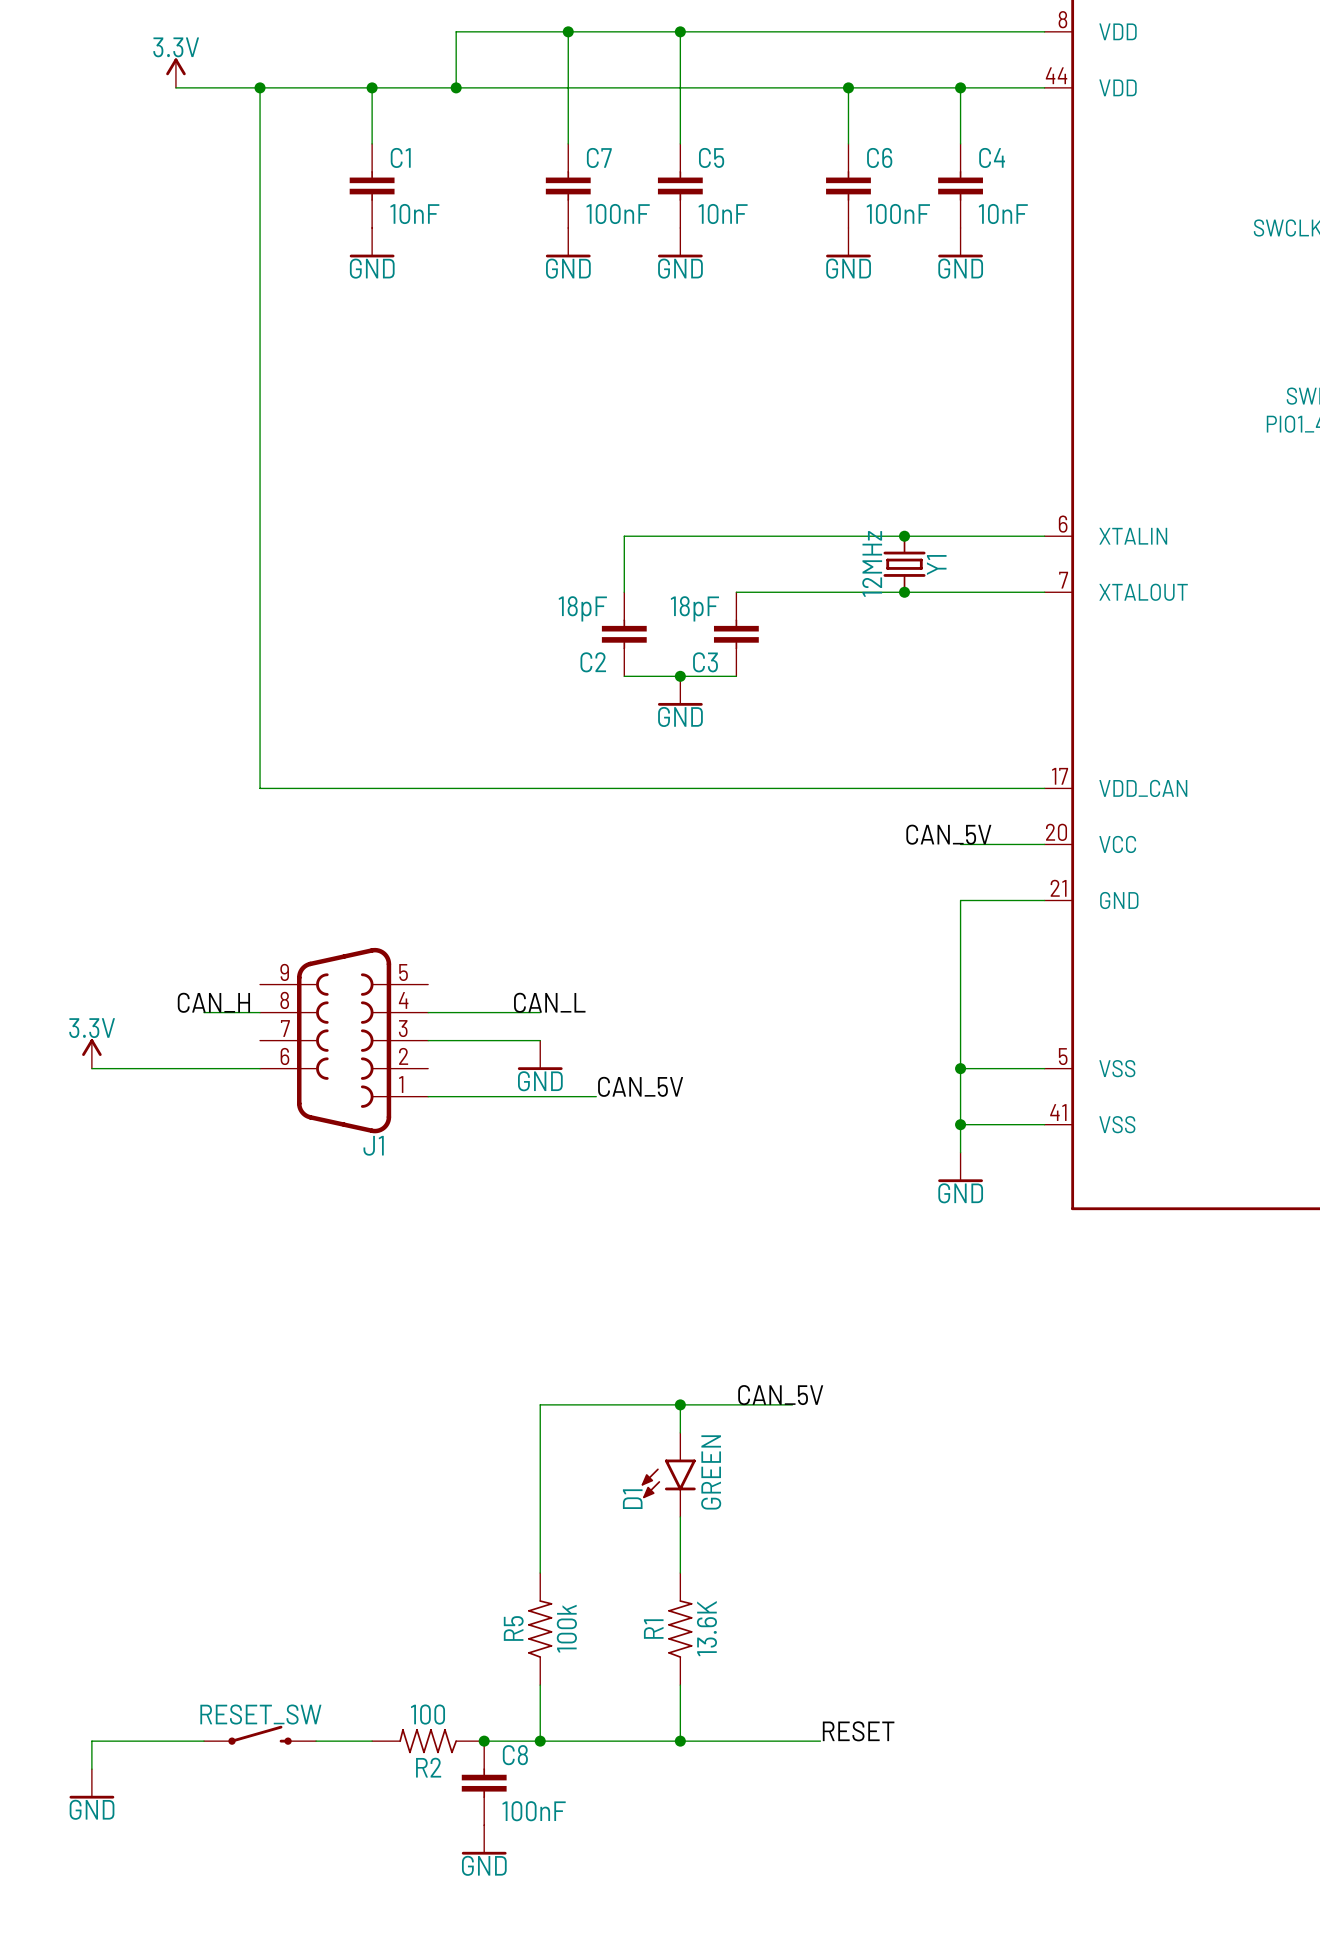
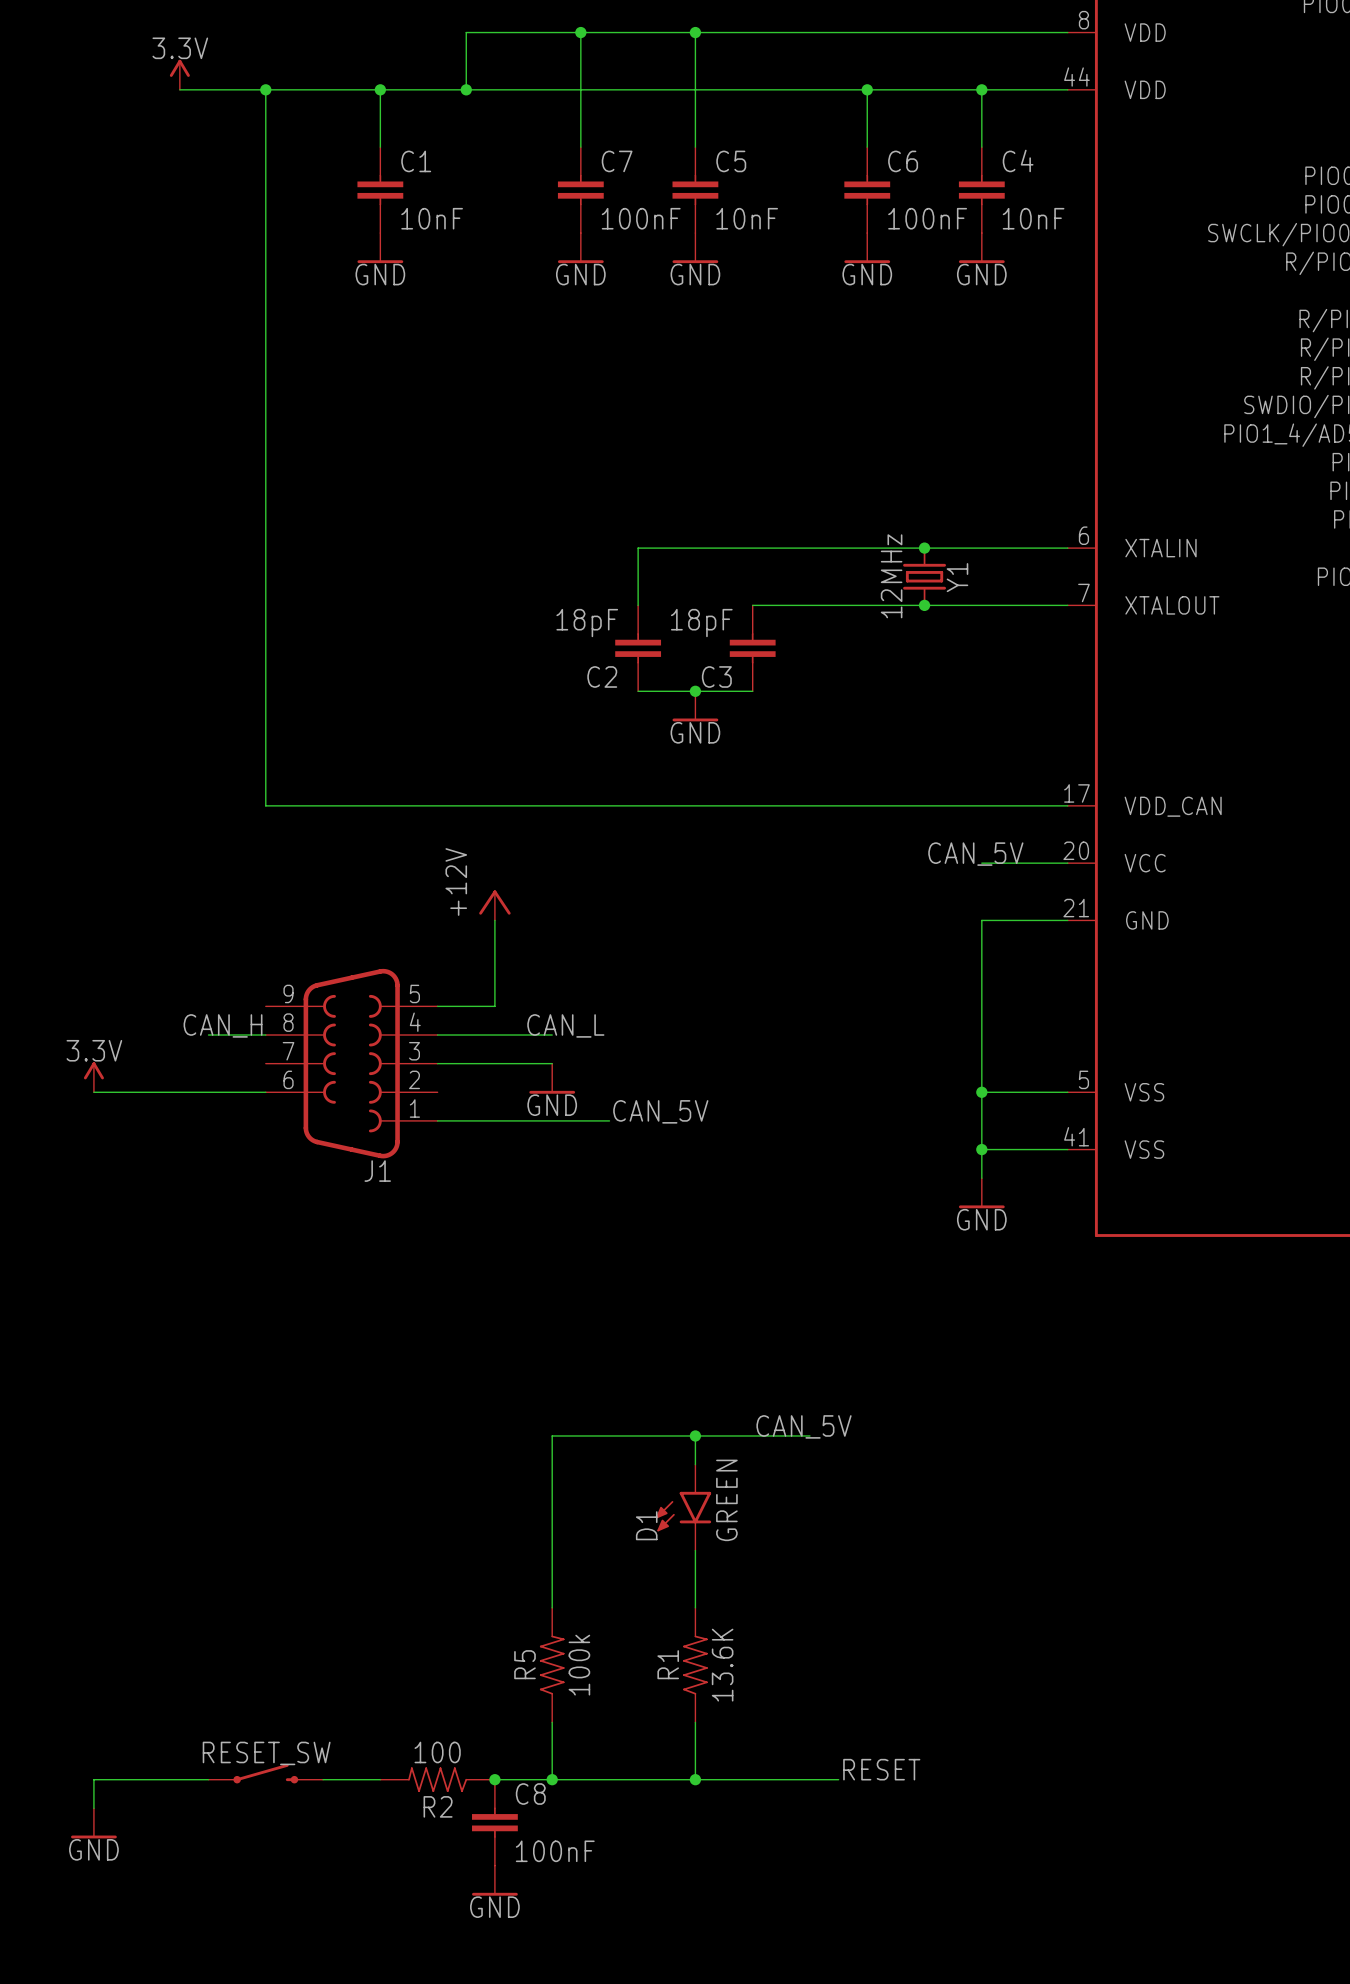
power symbol: none -> +12V (494, 905)
wire: none -> (494, 920) (494, 1006) (437, 1006)

